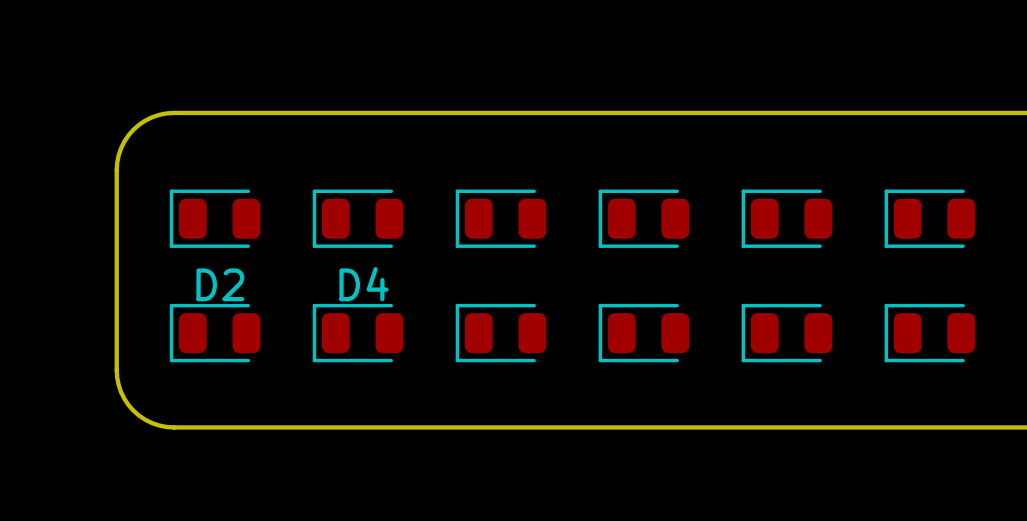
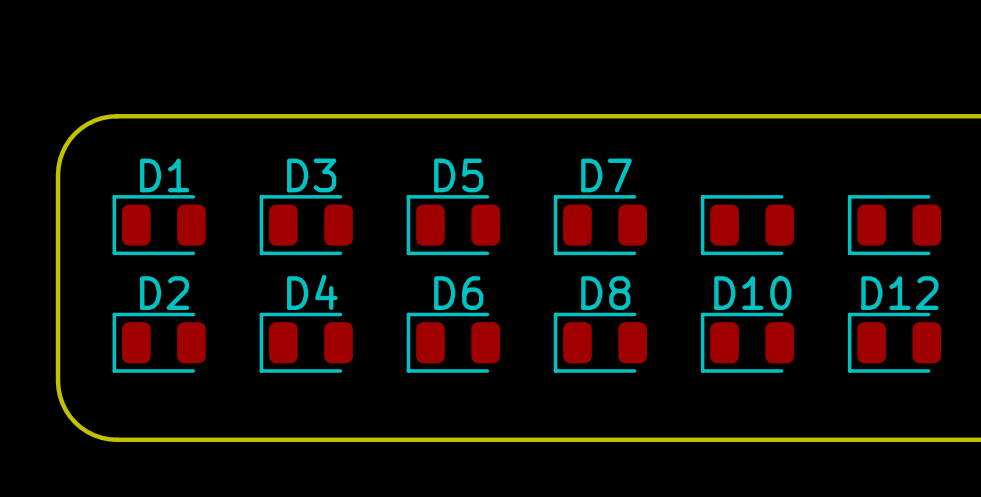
D1 name: none -> D1 (164, 175)
D3 name: none -> D3 (311, 175)
D5 name: none -> D5 (458, 175)
D7 name: none -> D7 (606, 175)
D6 name: none -> D6 (458, 293)
D8 name: none -> D8 (605, 293)
D10 name: none -> D10 (752, 293)
D12 name: none -> D12 (899, 293)

